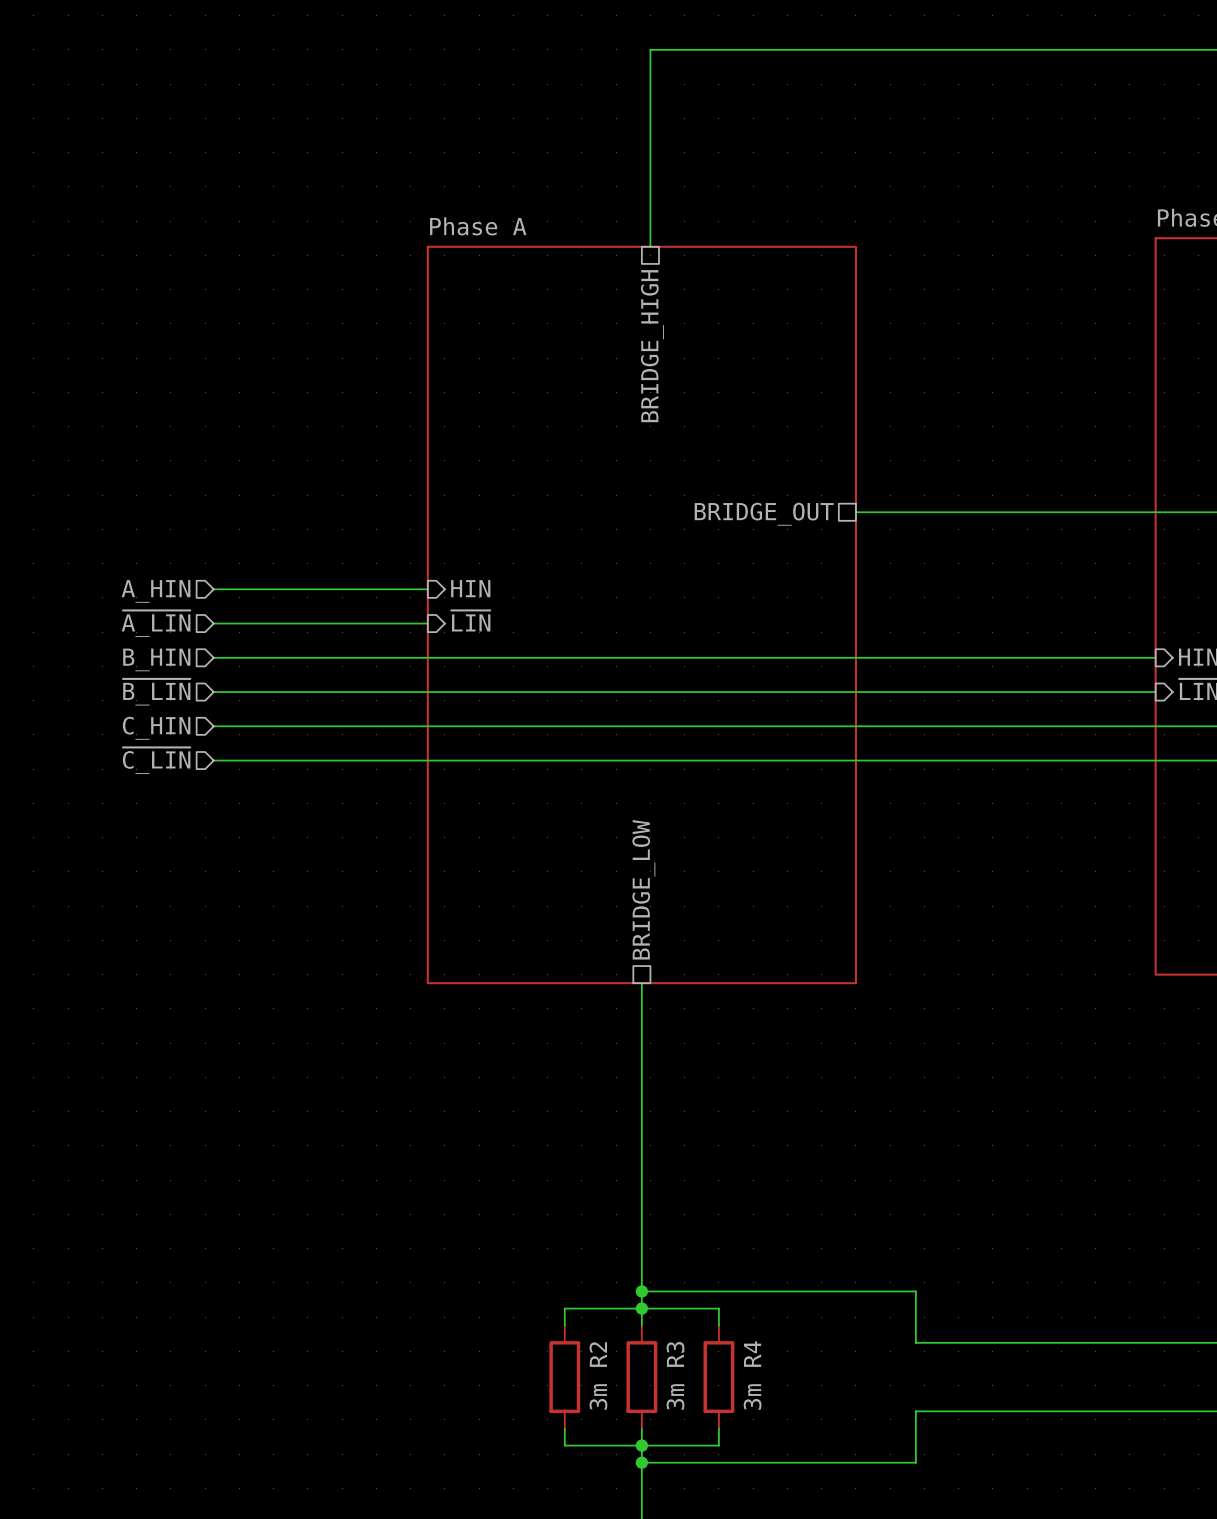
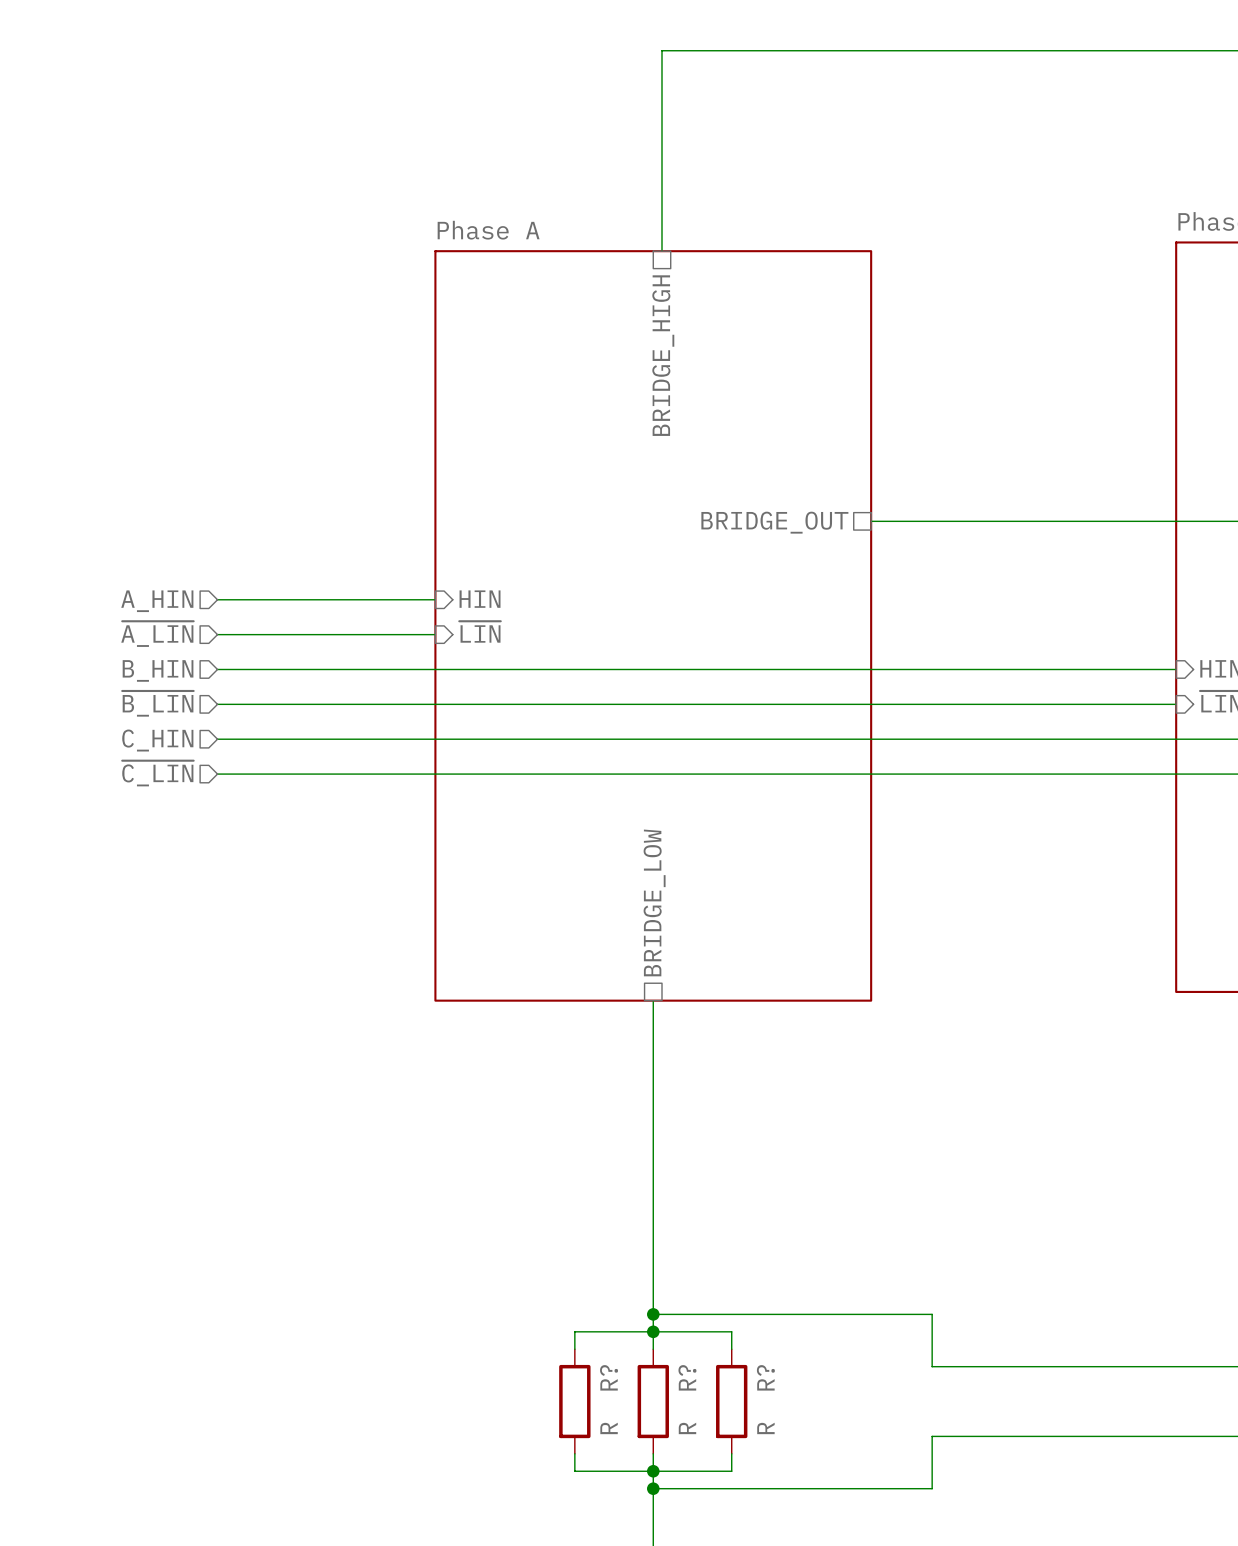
R2 name: R2 (598, 1354) -> R? (609, 1377)
R3 name: R3 (675, 1354) -> R? (687, 1377)
R4 name: R4 (752, 1354) -> R? (765, 1377)
R2 value: 3m (598, 1396) -> R (609, 1428)
R3 value: 3m (675, 1396) -> R (687, 1428)
R4 value: 3m (752, 1396) -> R (765, 1428)

